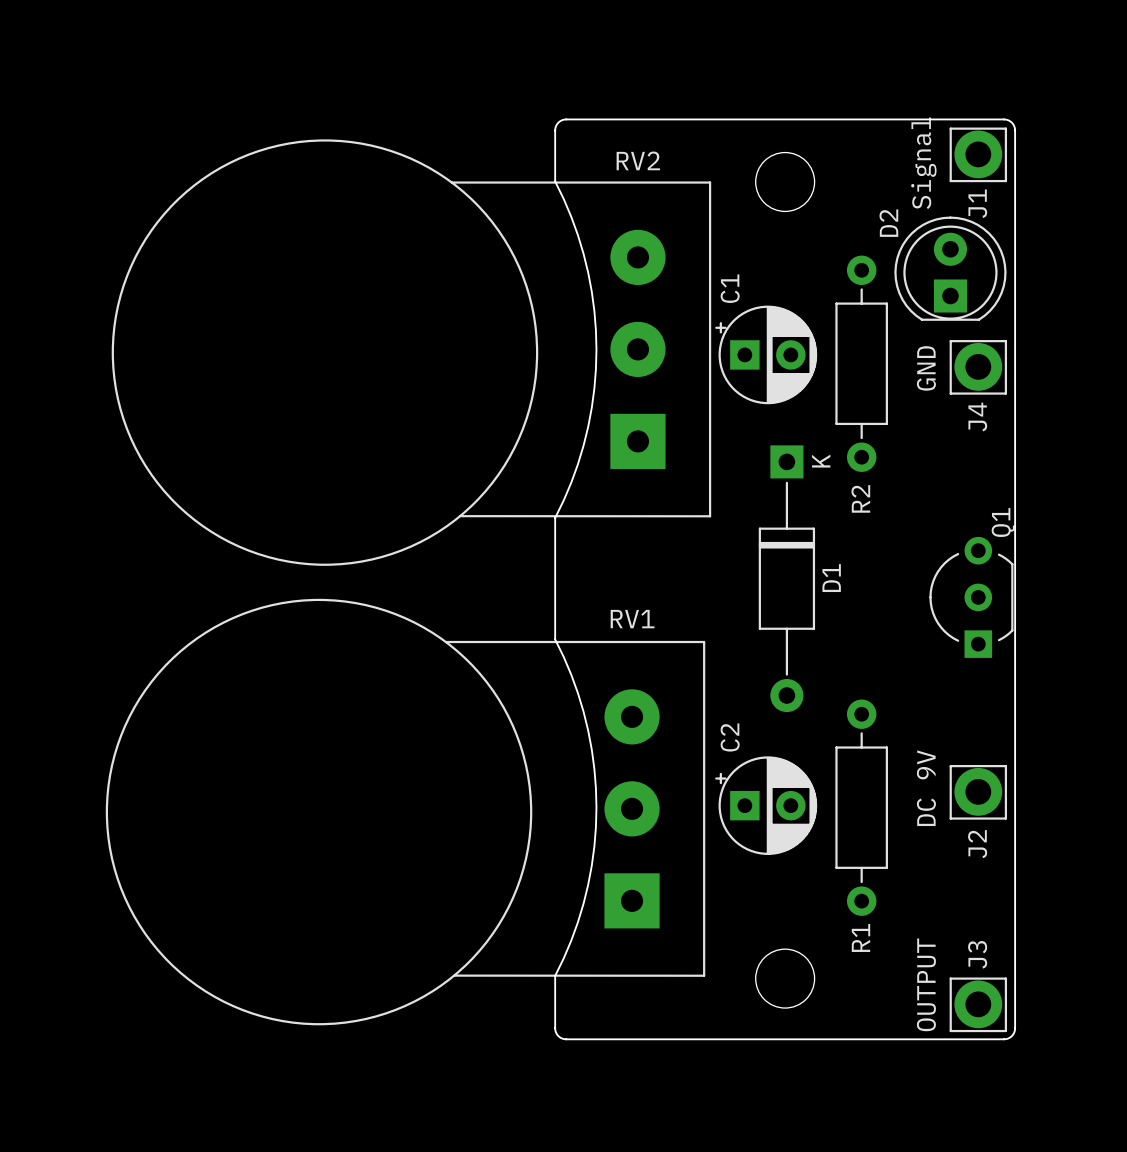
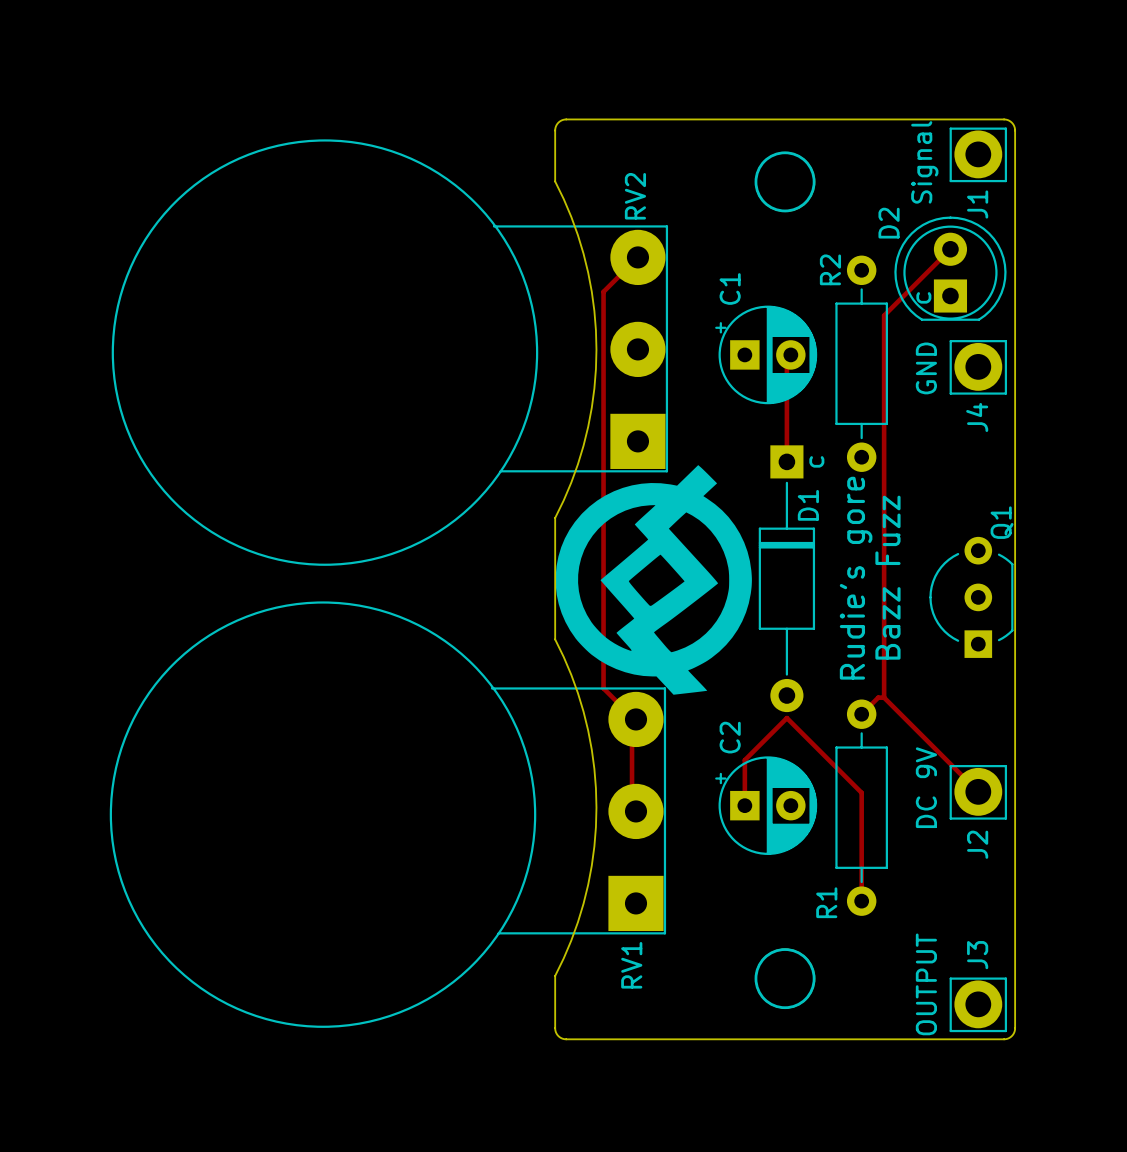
RV2 footprint: [111, 139, 712, 566] -> [111, 139, 669, 566]
drawing: none -> [754, 151, 816, 213]
RV2 name position: RV2 (638, 160) -> RV2 (635, 196)
track: none -> (950, 249) (884, 315) (884, 697)
track: none -> (637, 257) (603, 291) (603, 688) (632, 716) (632, 808)
text: none -> c (923, 297)
track: none -> (790, 354) (786, 358) (786, 461)
D1 text: none -> c (816, 461)
D1 text: K (821, 461) -> none
drawing: none -> [555, 465, 752, 695]
R2 name position: R2 (860, 498) -> R2 (830, 269)
D1 name position: D1 (831, 578) -> D1 (808, 505)
text: none -> Rudie's gore (856, 578)
text: none -> Bazz Fuzz (887, 577)
RV1 footprint: [105, 598, 706, 1026] -> [109, 601, 667, 1028]
RV1 name position: RV1 (632, 619) -> RV1 (631, 965)
track: none -> (884, 697) (878, 697) (861, 714)
track: none -> (884, 697) (978, 791)
track: none -> (744, 805) (744, 760) (786, 718) (861, 792) (861, 901)
R1 name position: R1 (860, 937) -> R1 (826, 902)
drawing: none -> [754, 948, 816, 1010]

